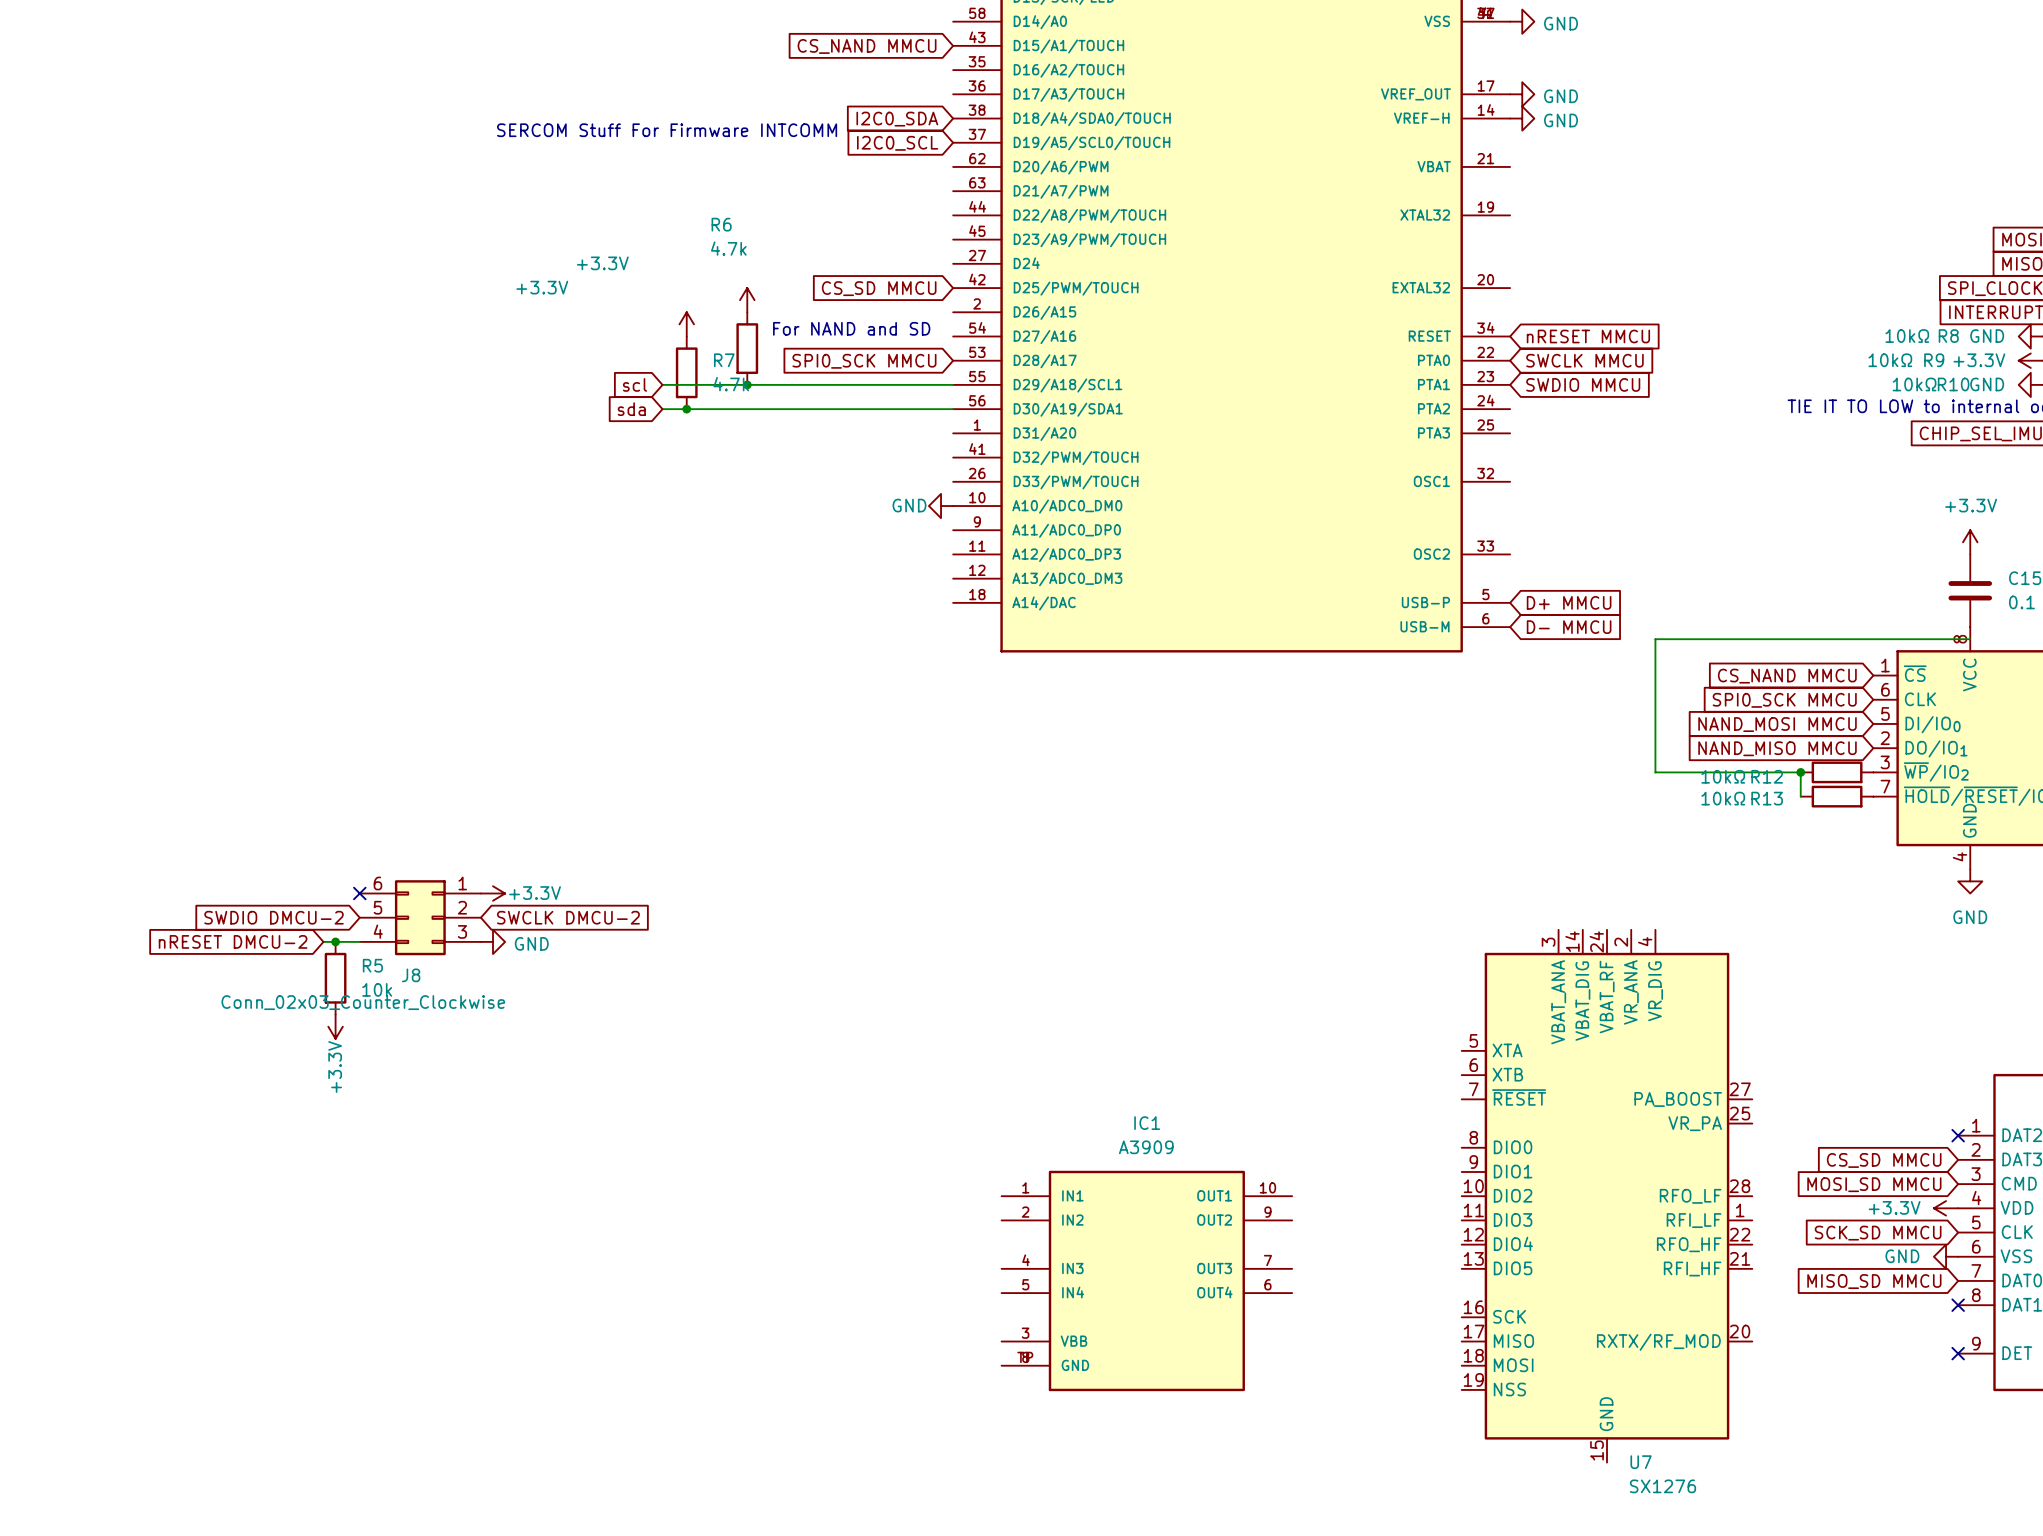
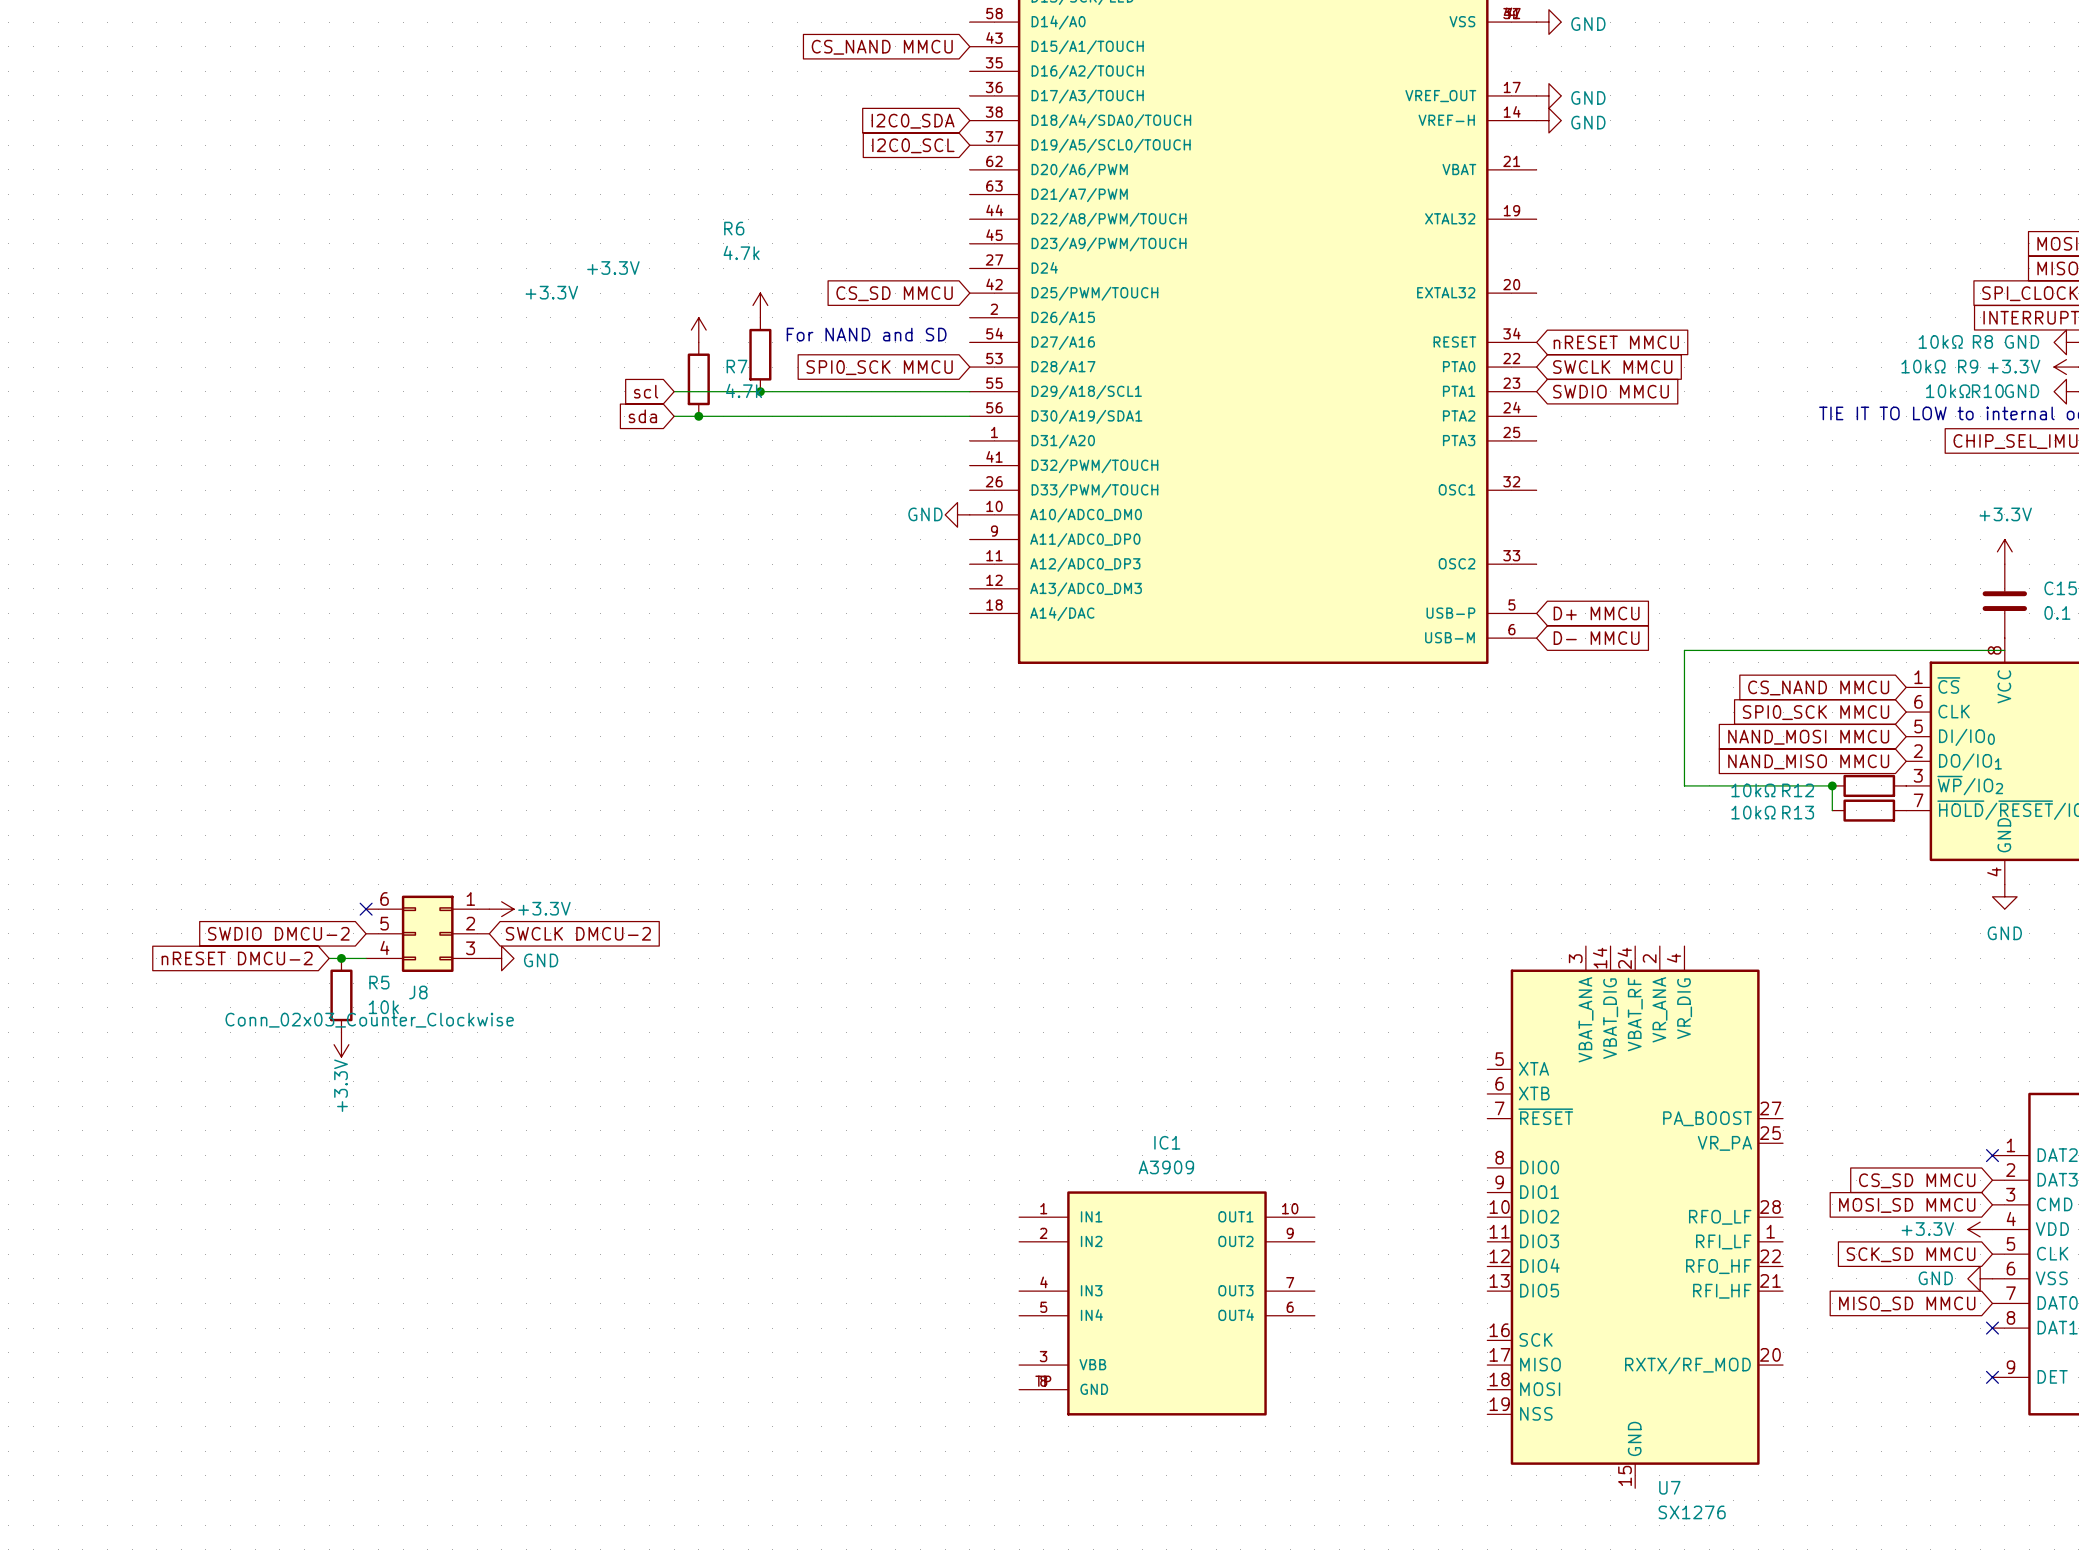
text: SERCOM Stuff For Firmware INTCOMM (667, 130) -> none

